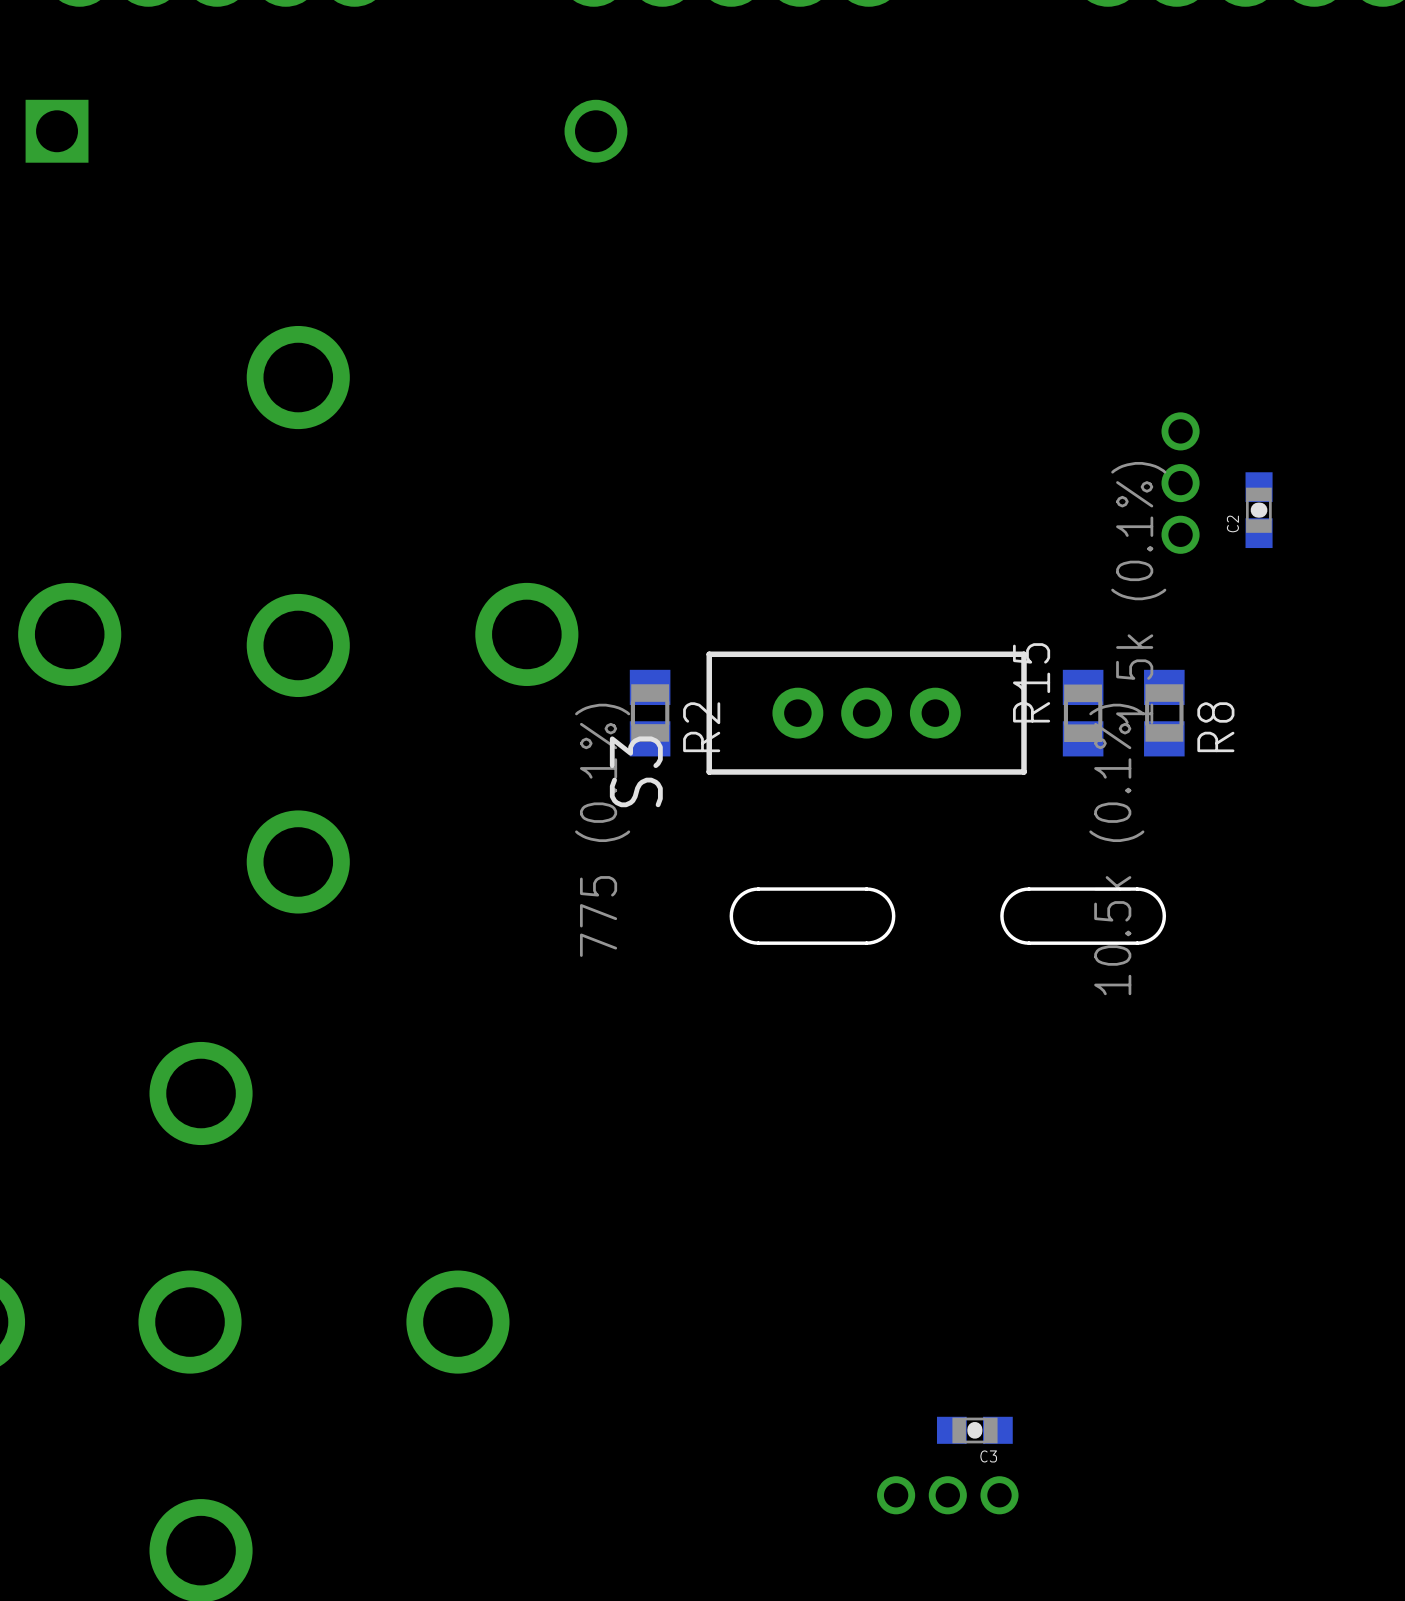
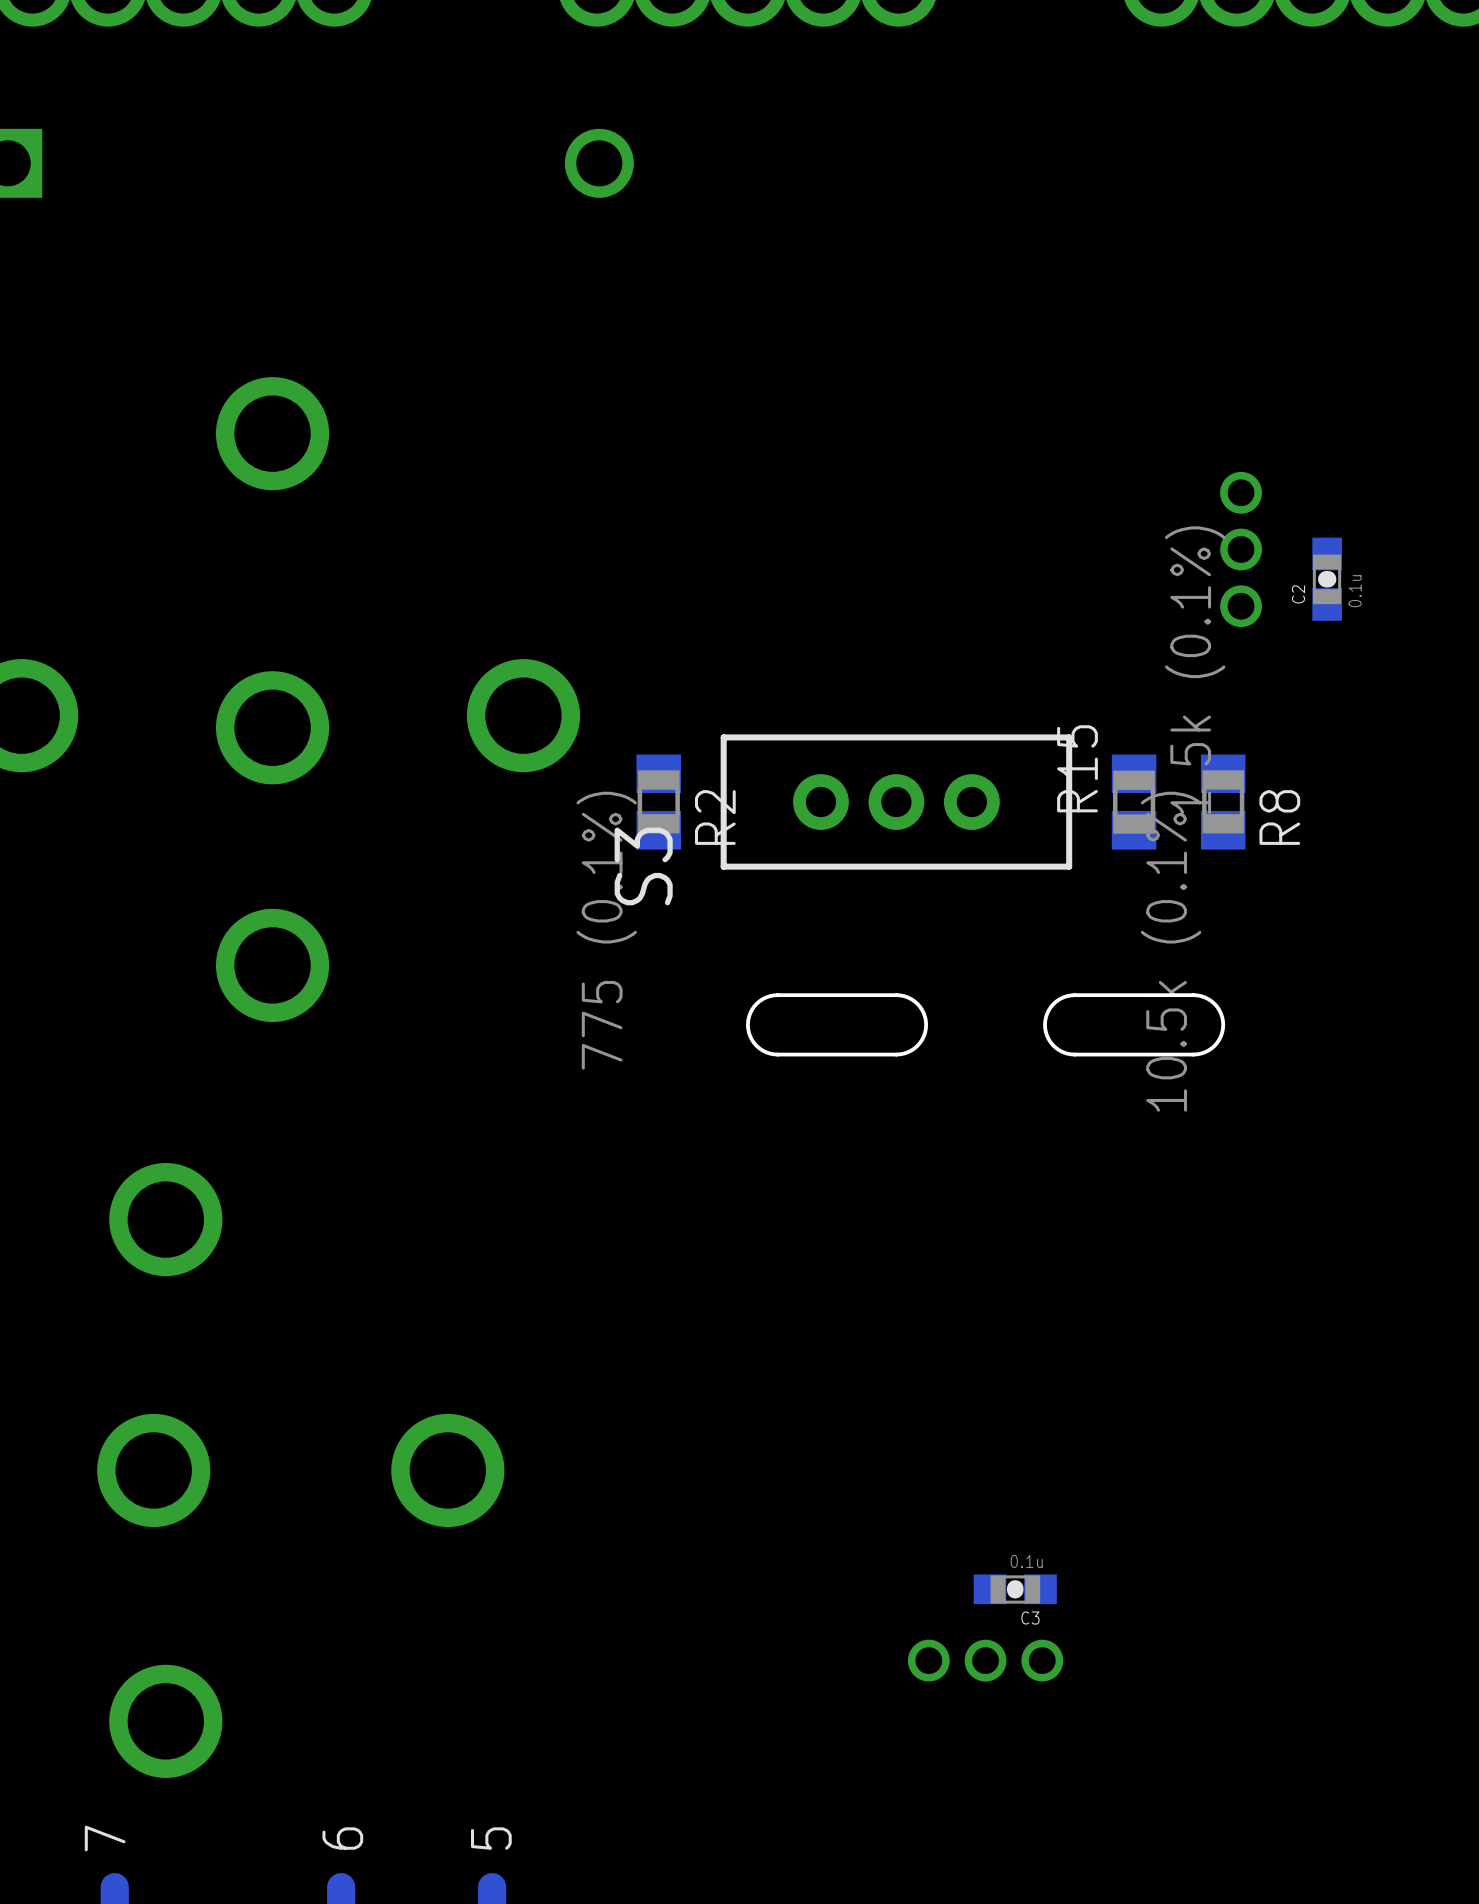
C2 value: none -> 0.1u (1355, 591)
C3 value: none -> 0.1u (1026, 1561)

